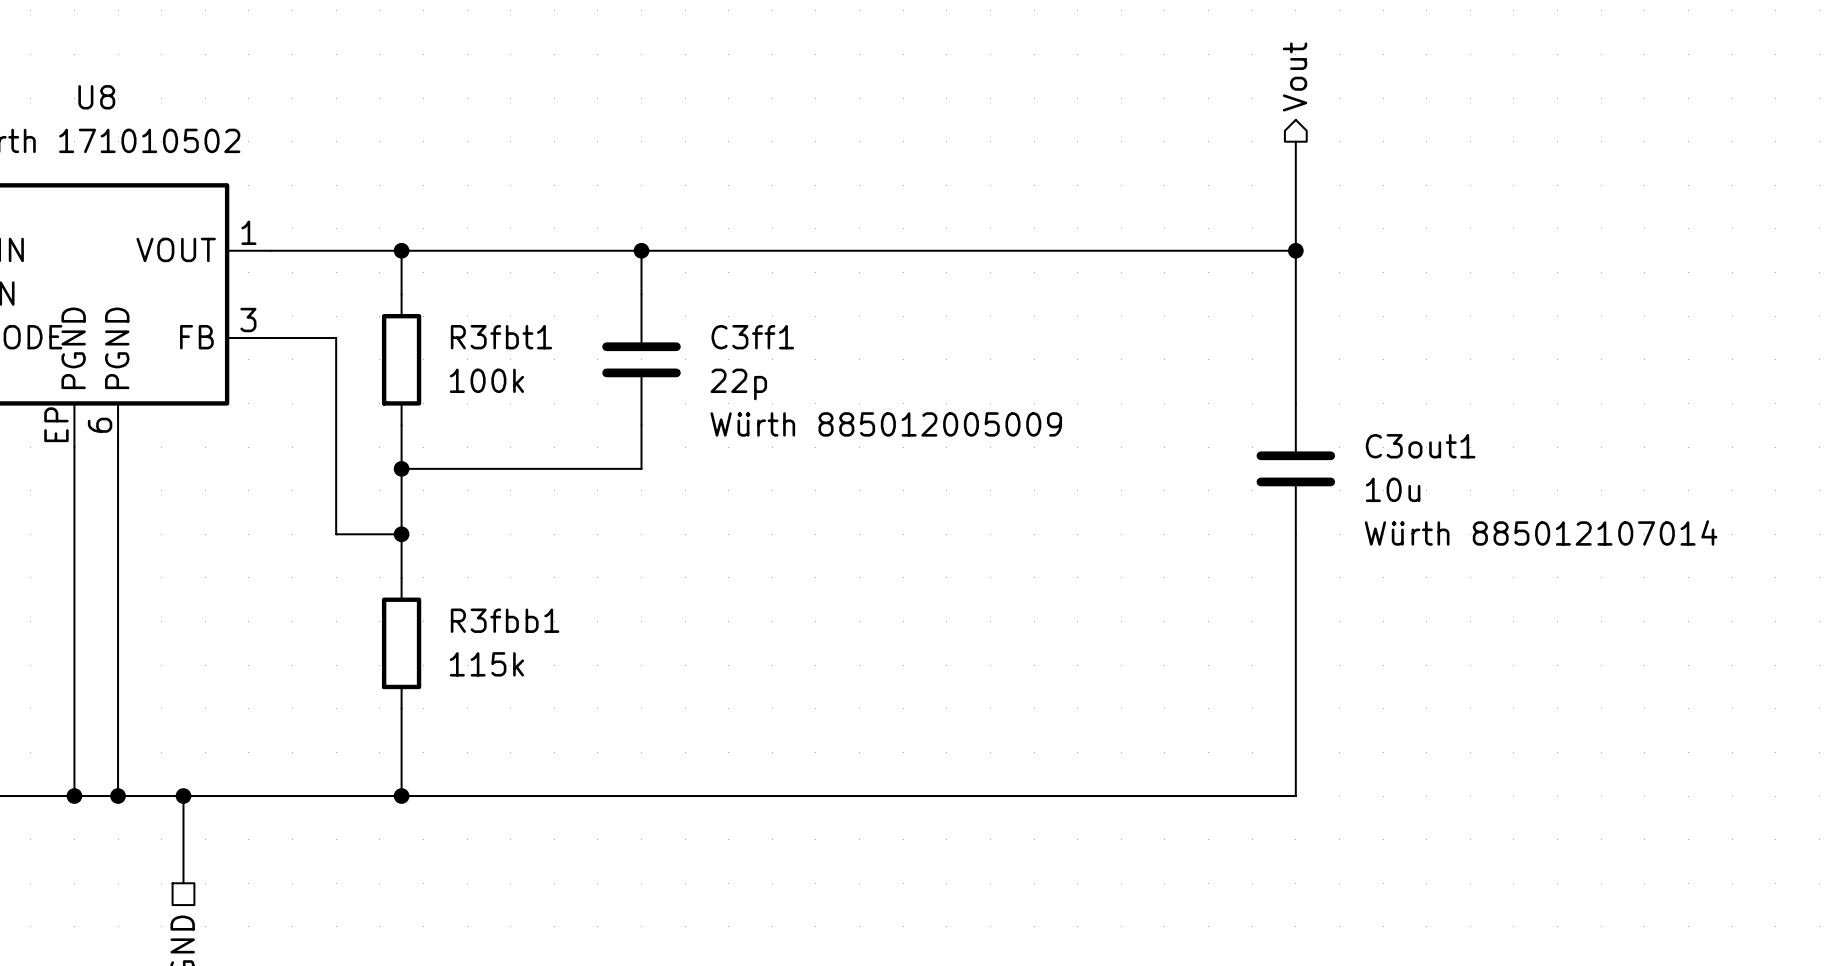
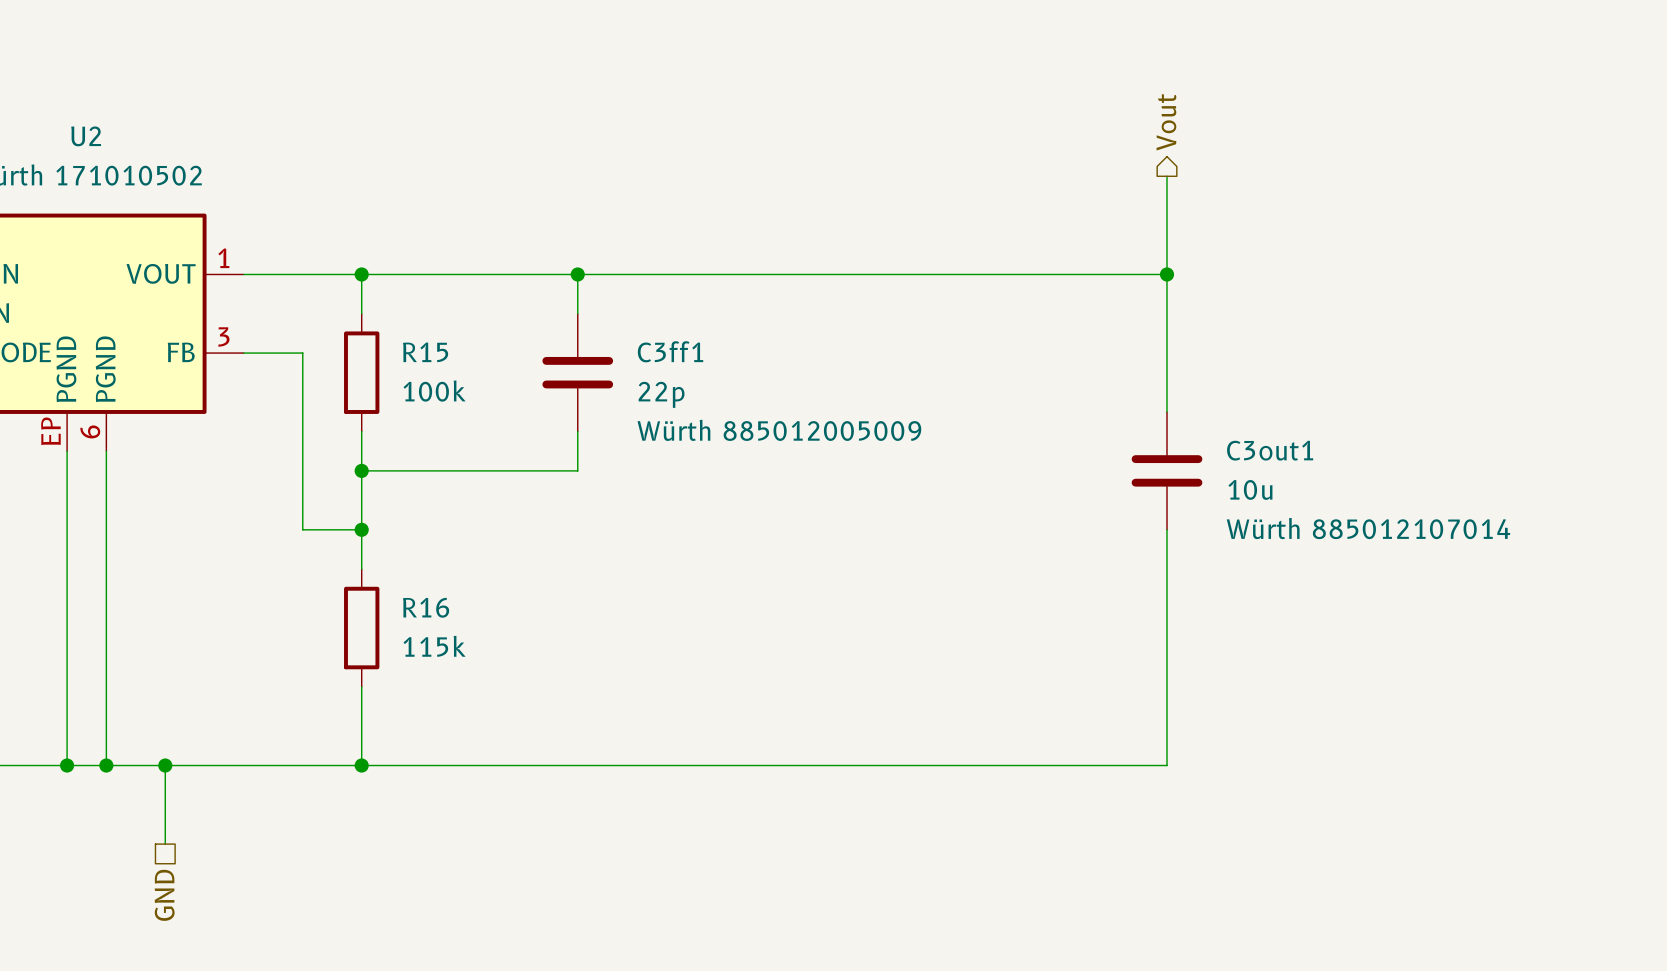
U8 name: U8 (96, 97) -> U2 (86, 136)
R3fbt1 name: R3fbt1 (501, 337) -> R15 (425, 352)
R3fbb1 name: R3fbb1 (505, 620) -> R16 (426, 607)

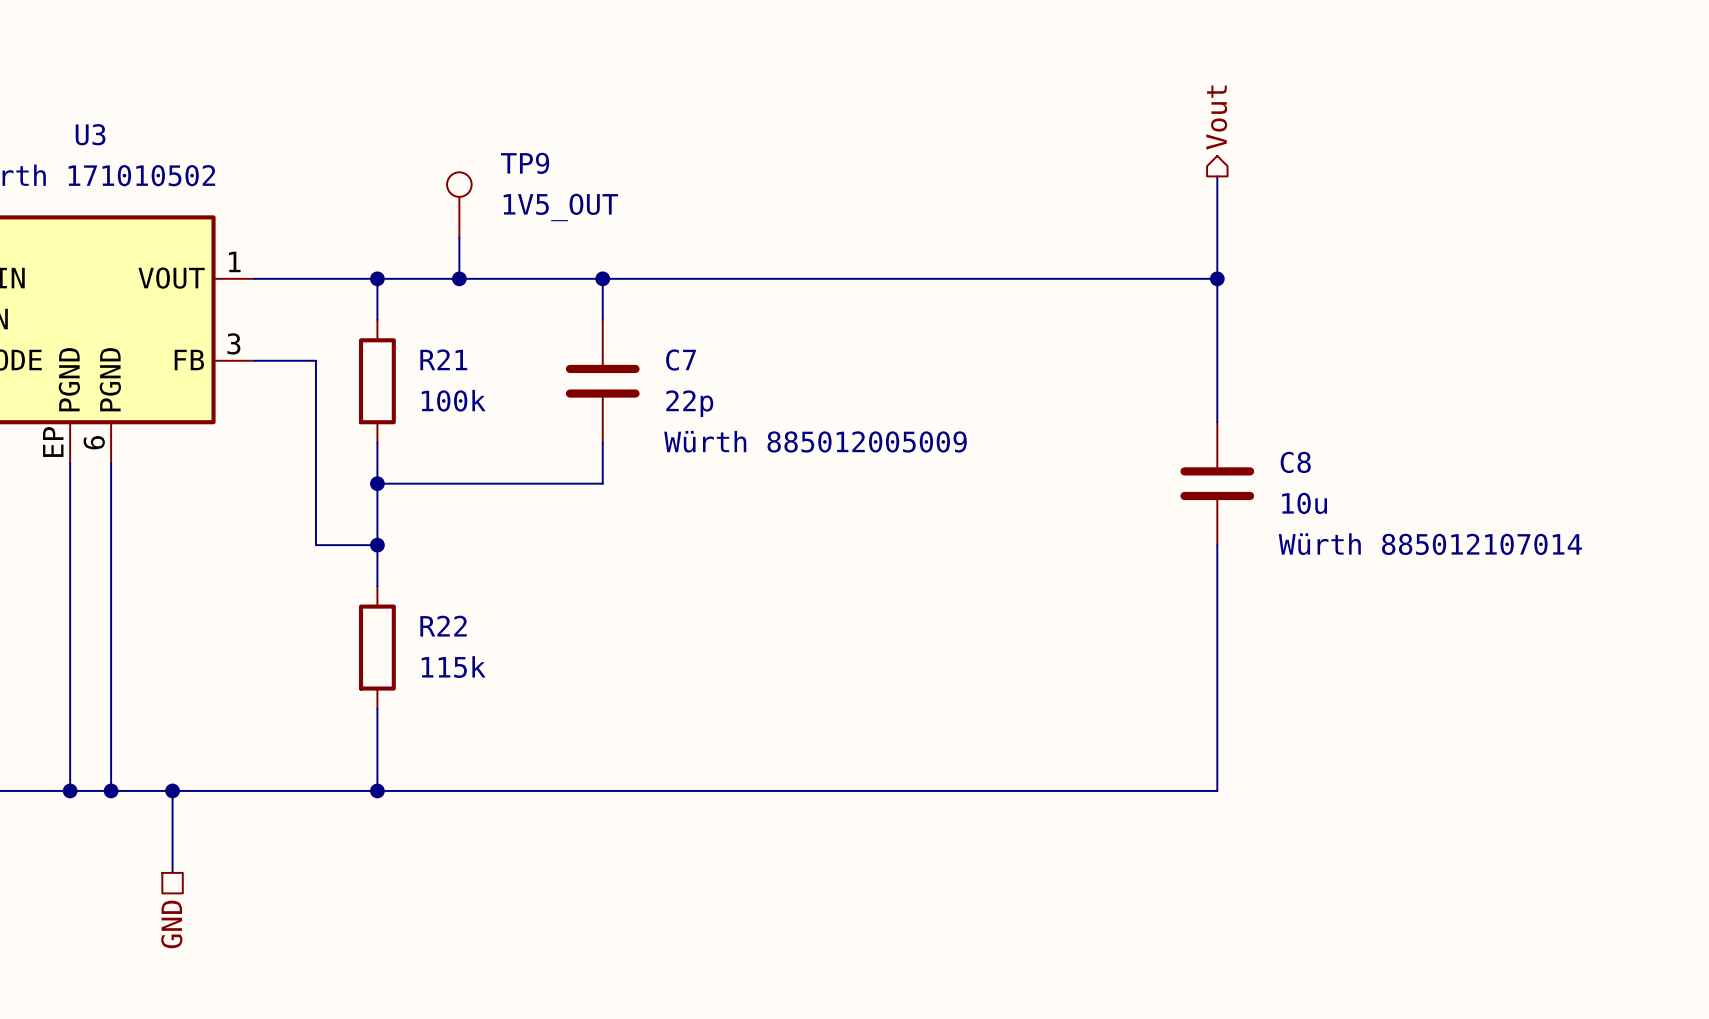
U2 name: U2 (86, 136) -> U3 (90, 134)
TP9: none -> 1V5_OUT (459, 205)
wire: none -> (459, 237) (459, 278)
junction: none -> (459, 278)
C3ff1 name: C3ff1 (670, 351) -> C7 (681, 360)
R15 name: R15 (425, 352) -> R21 (443, 359)
C3out1 name: C3out1 (1270, 450) -> C8 (1295, 462)
R16 name: R16 (426, 607) -> R22 (443, 626)

